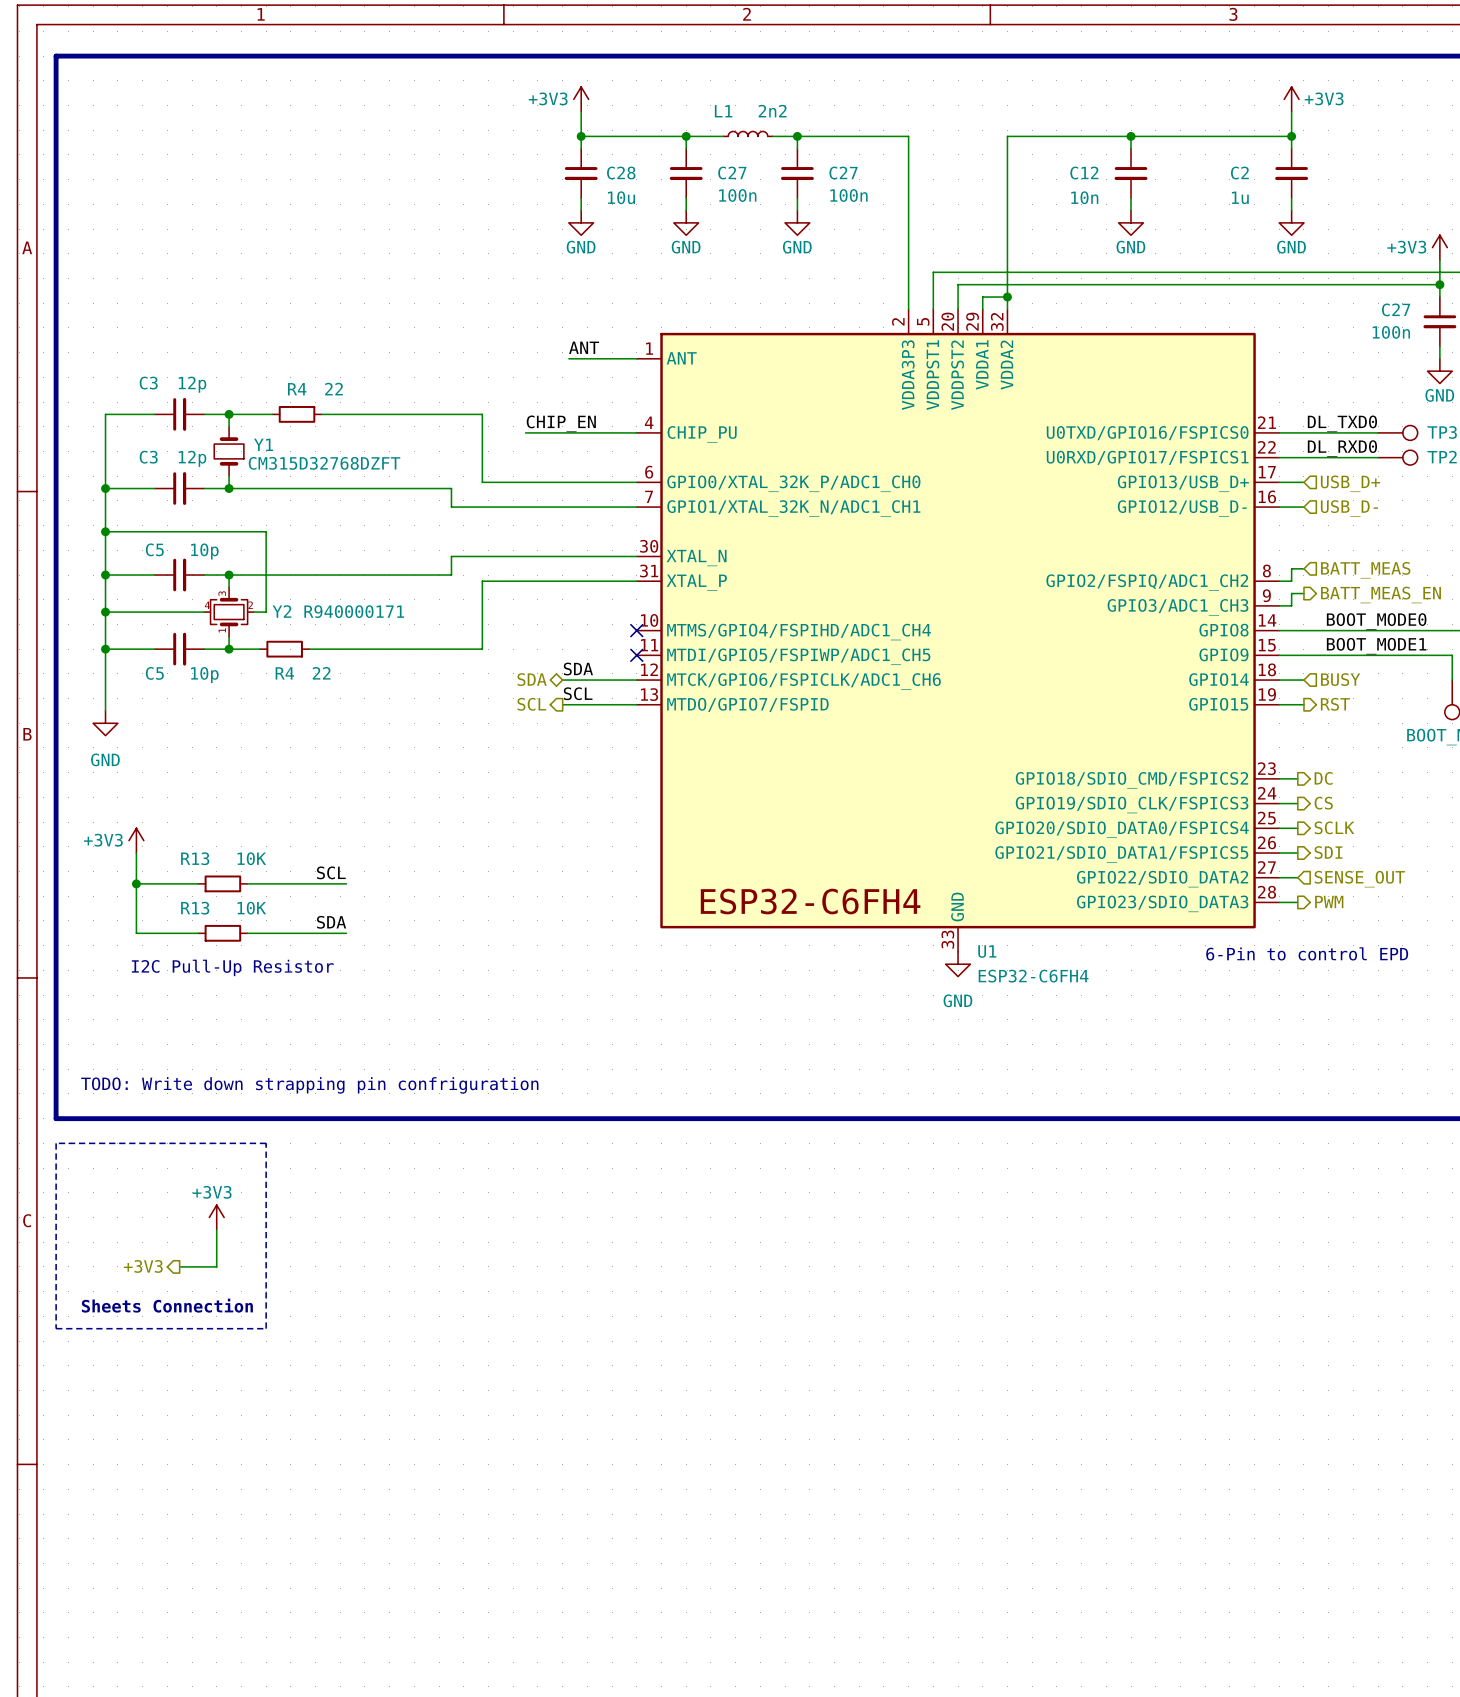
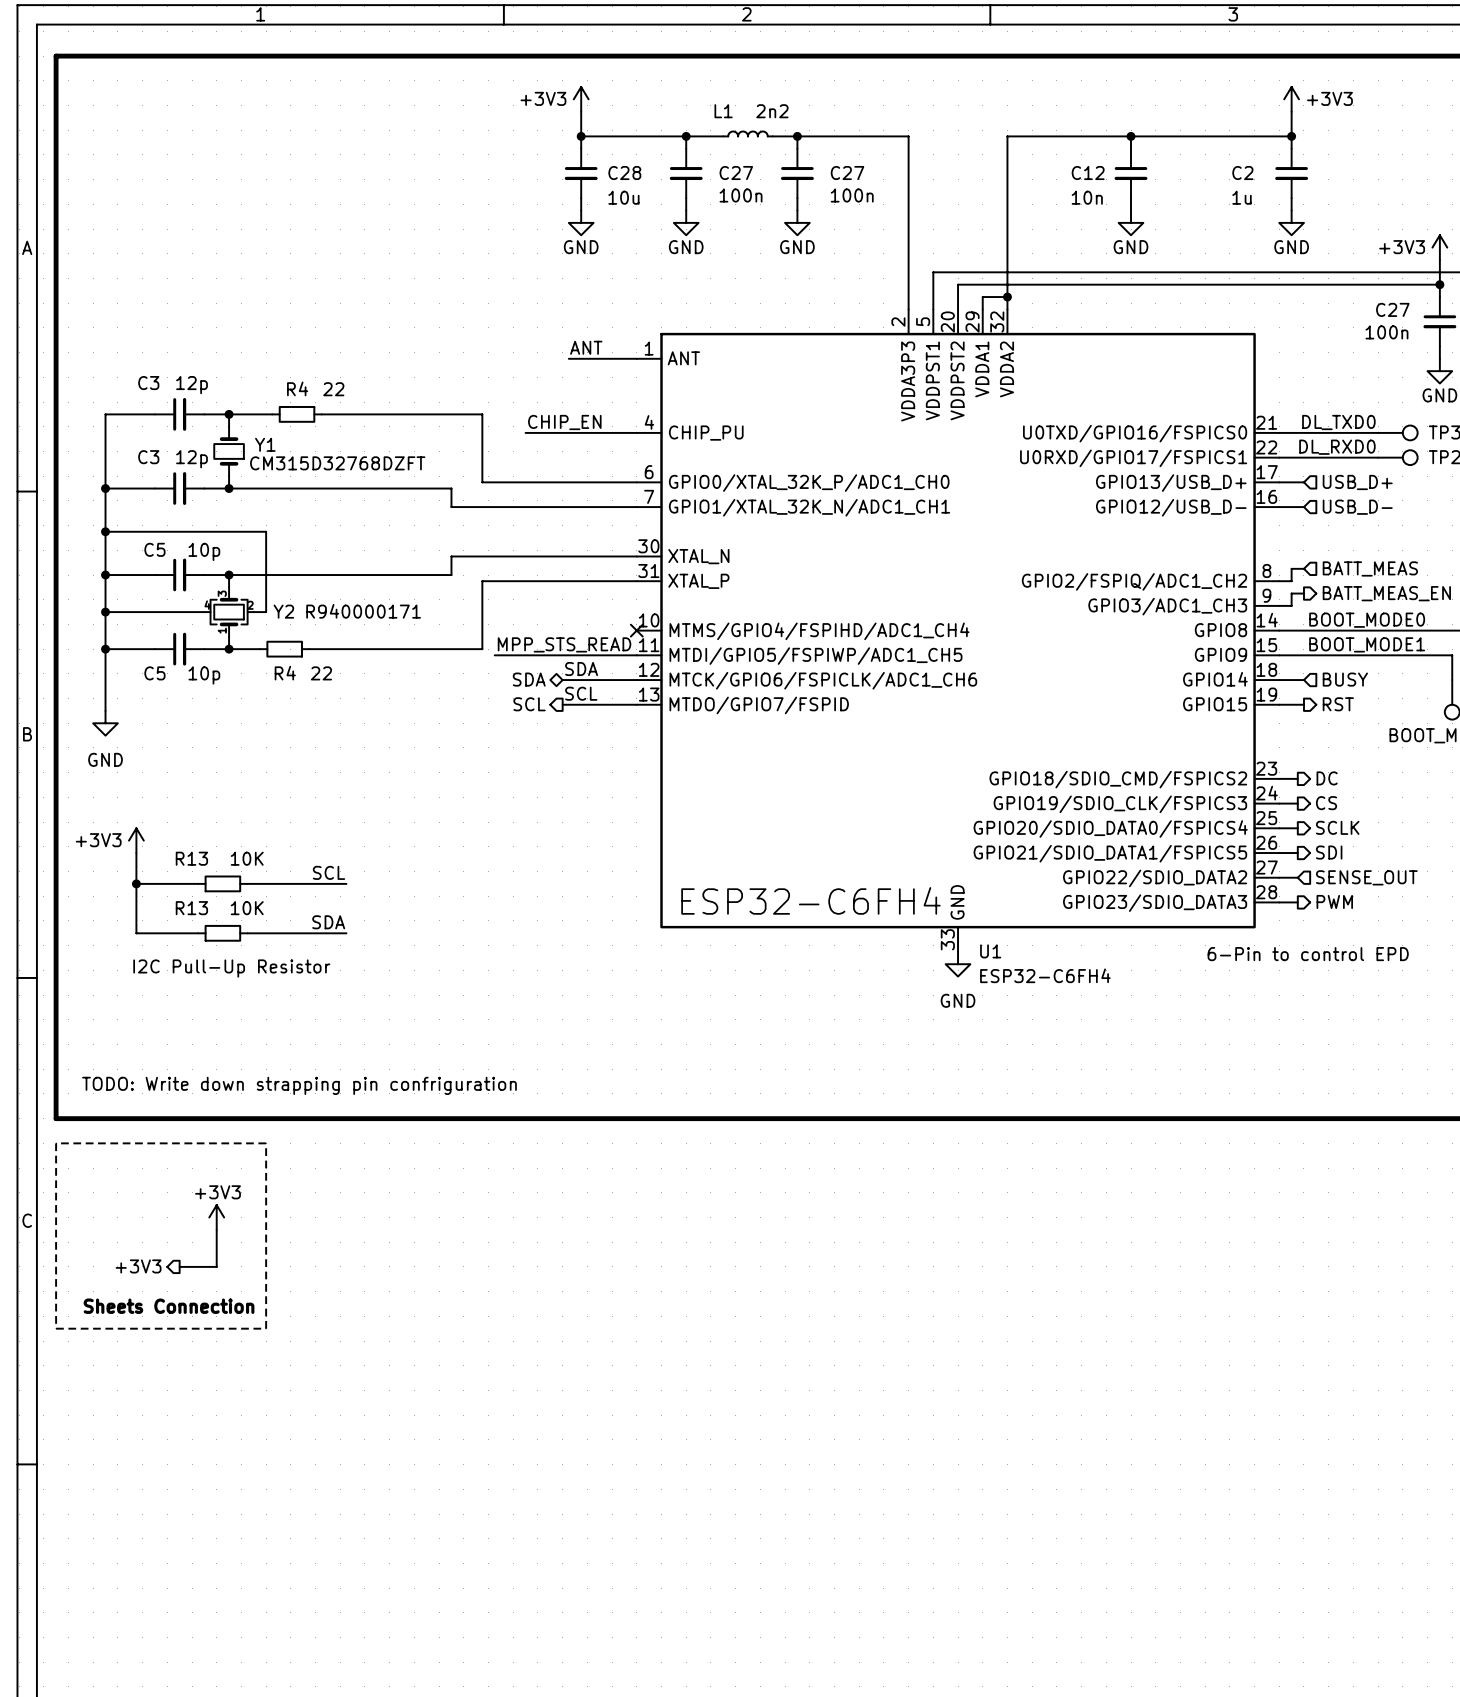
label: none -> MPP_STS_READ (564, 644)
wire: none -> (494, 655) (636, 655)
no-connect mark: (636, 655) -> none

